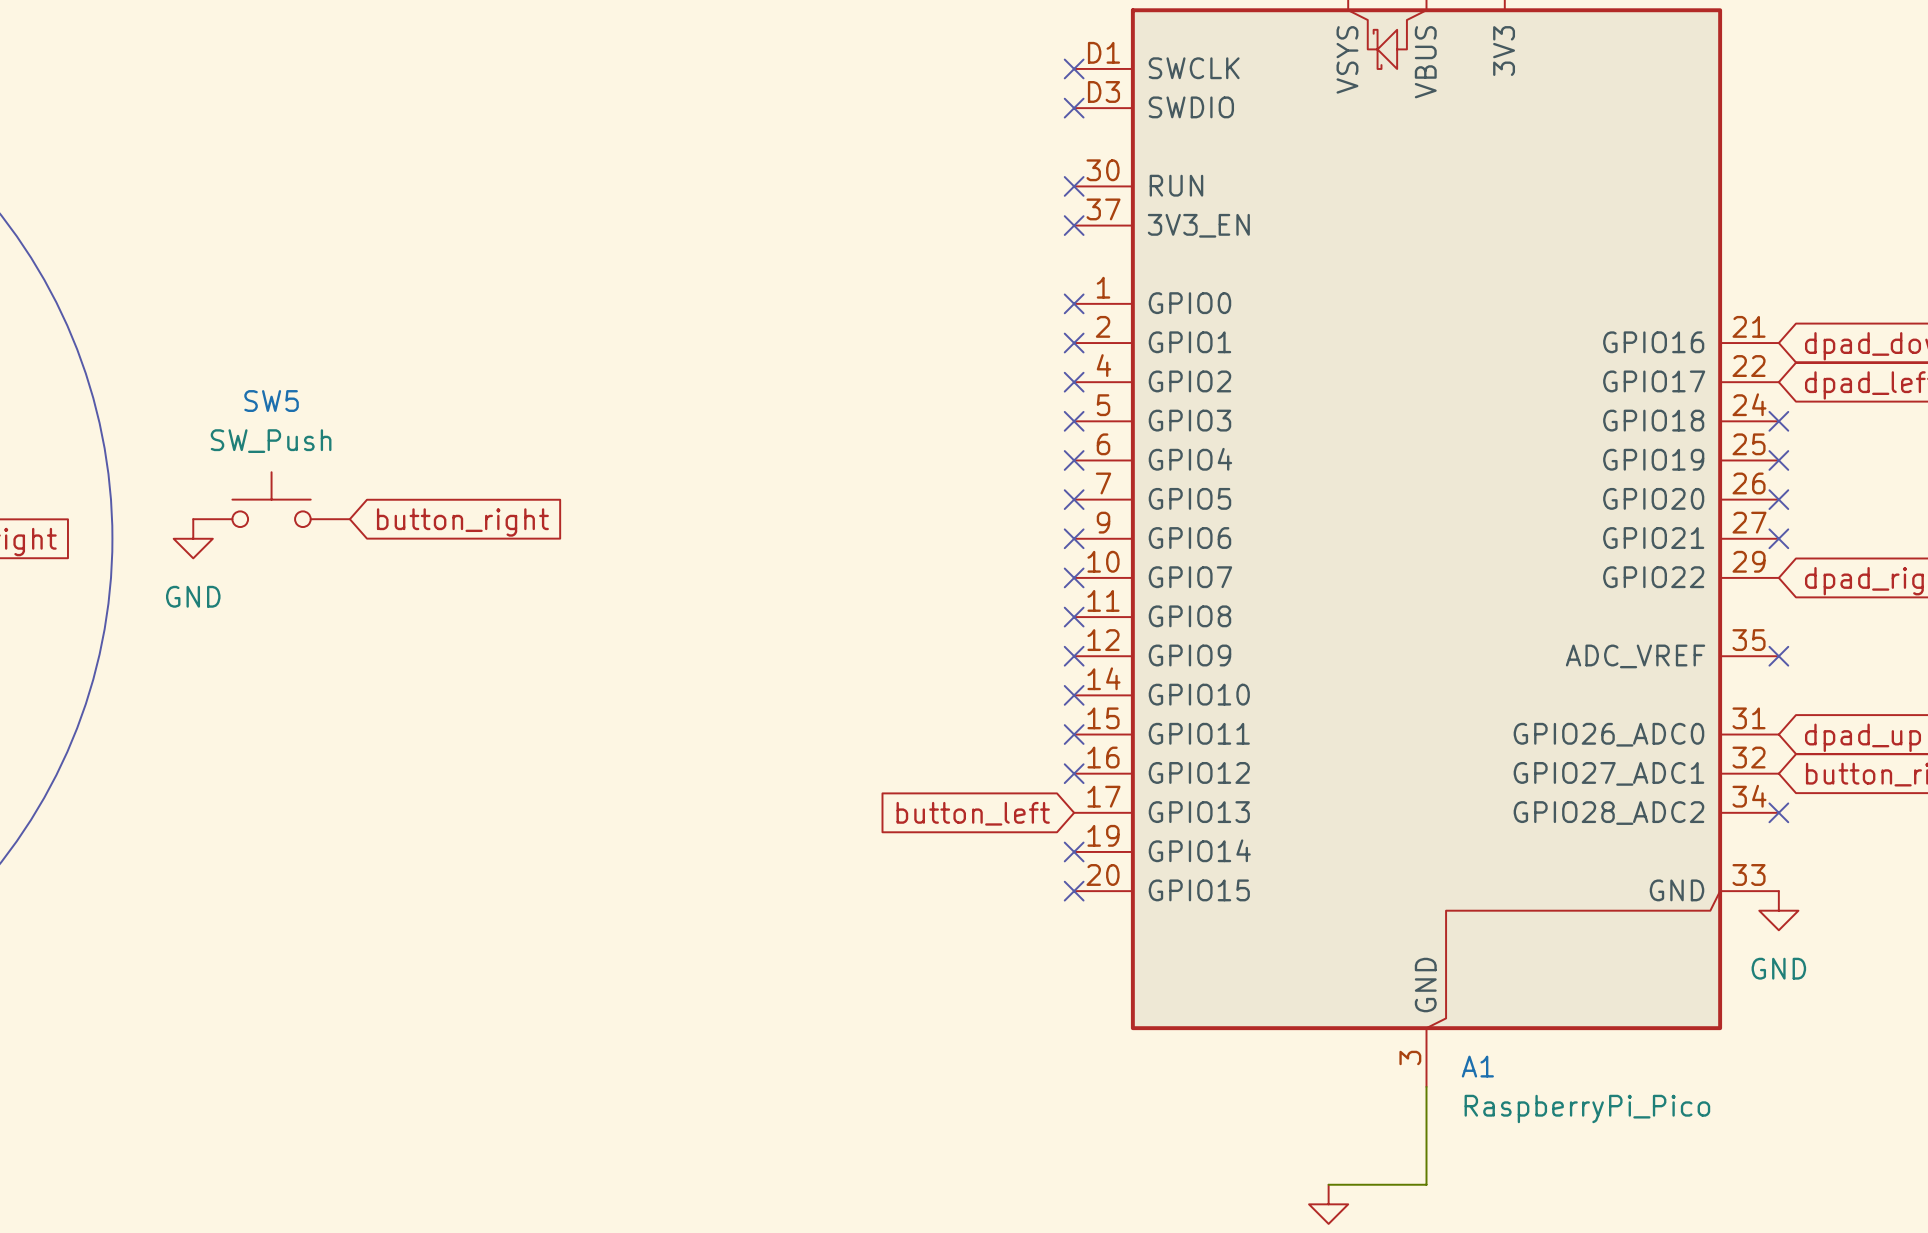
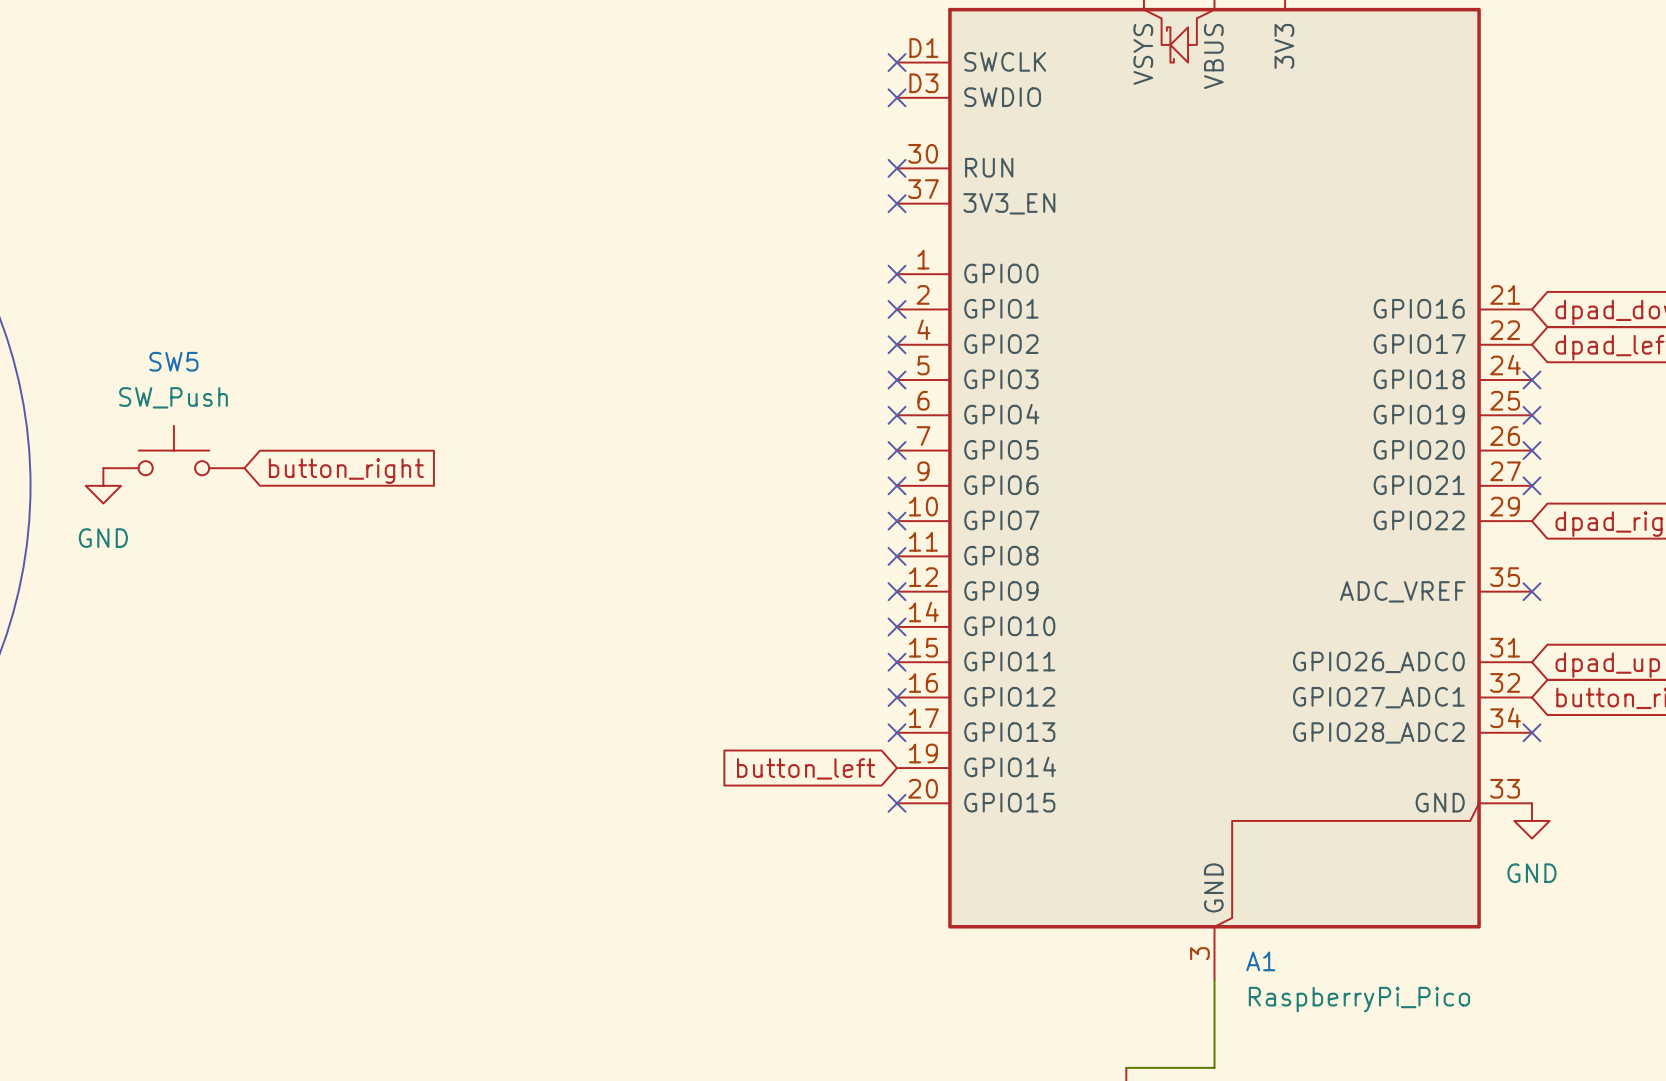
global label position: button_left (973, 813) -> button_left (806, 768)
no-connect mark position: (1074, 851) -> (897, 732)

